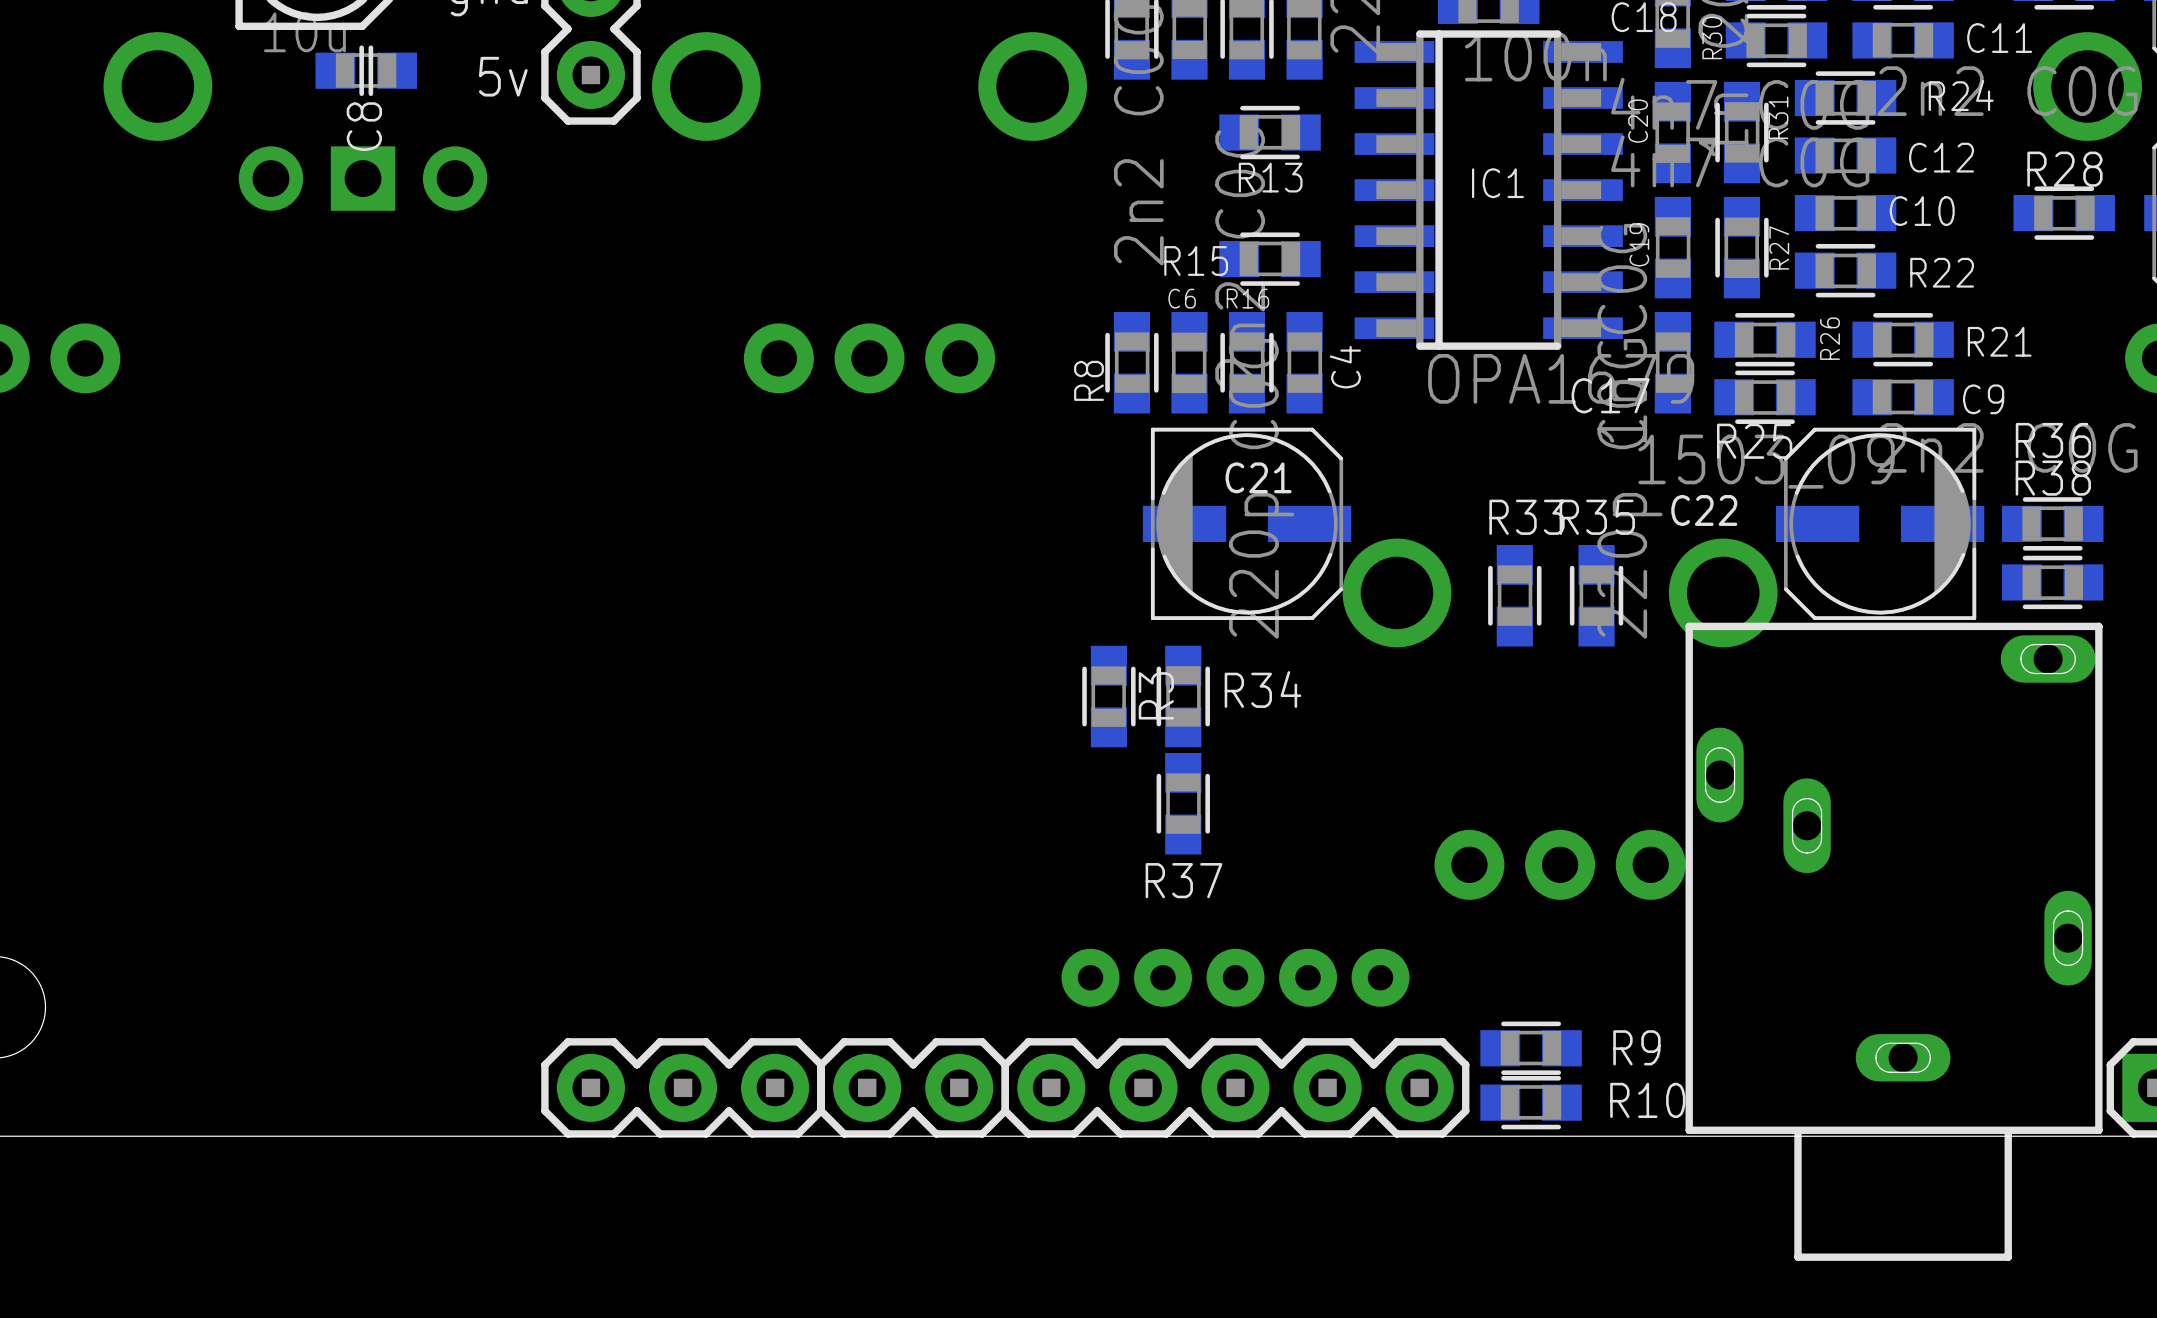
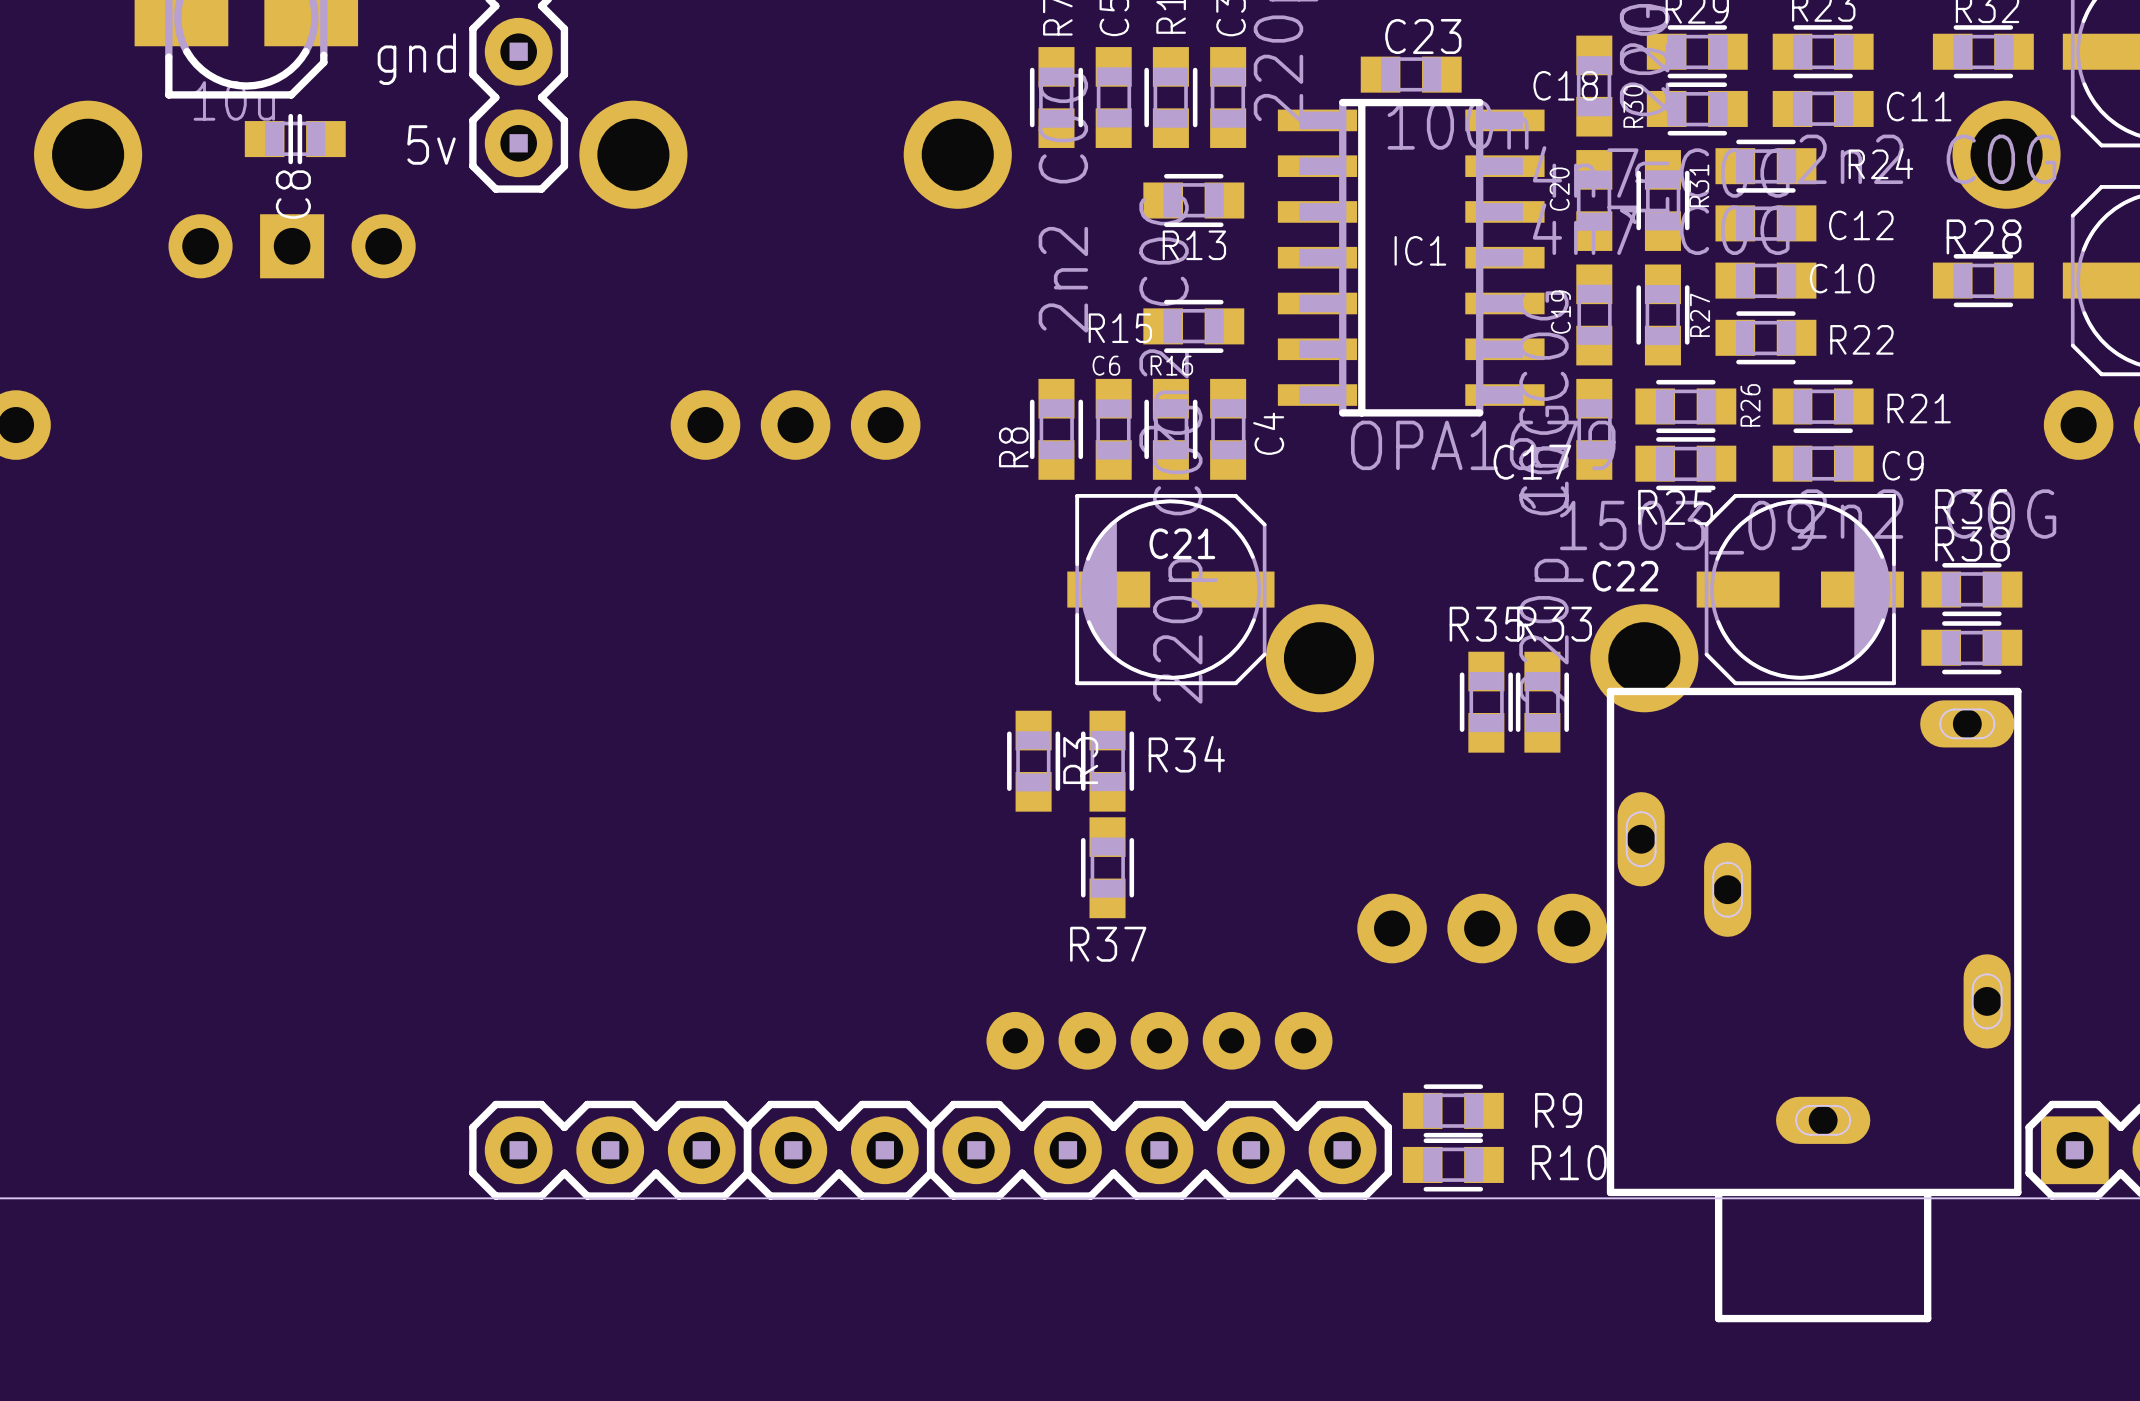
R33 position: (1514, 595) -> (1542, 702)
R35 position: (1596, 595) -> (1486, 702)

